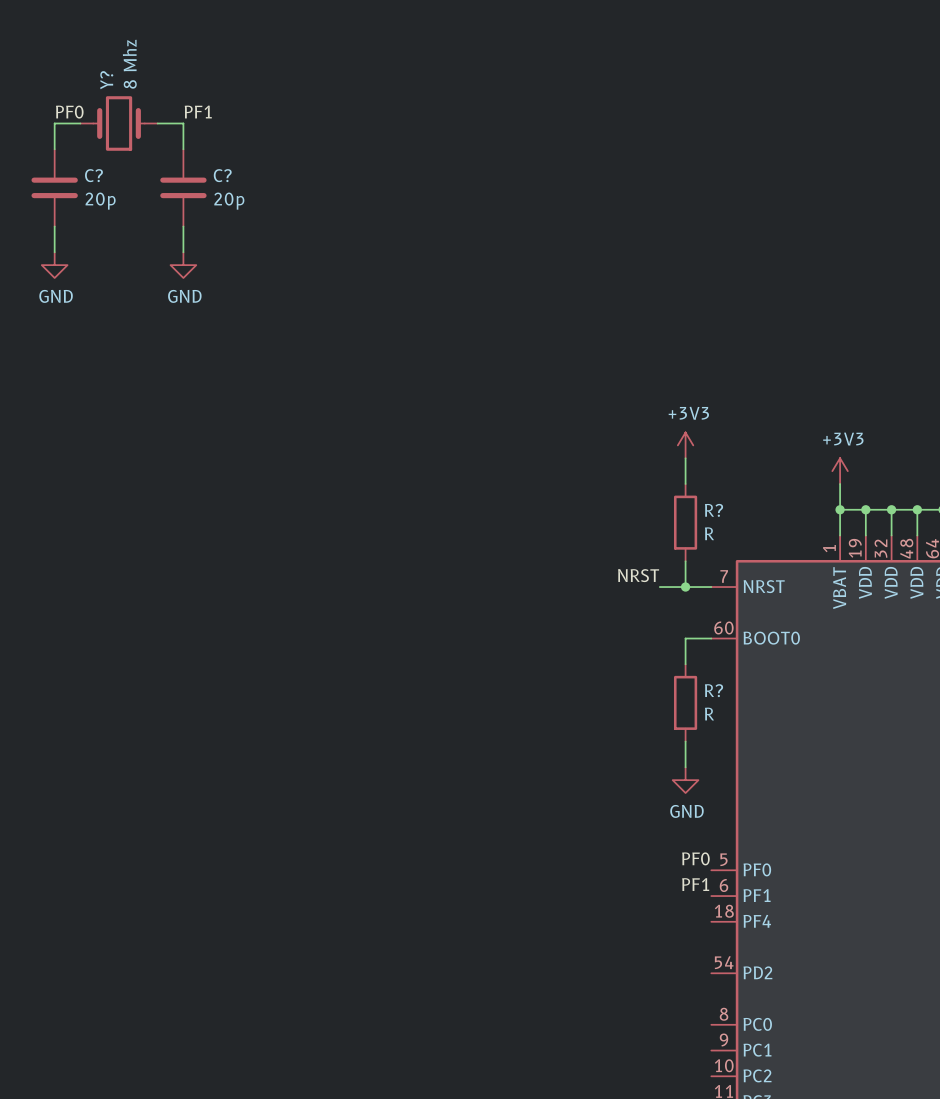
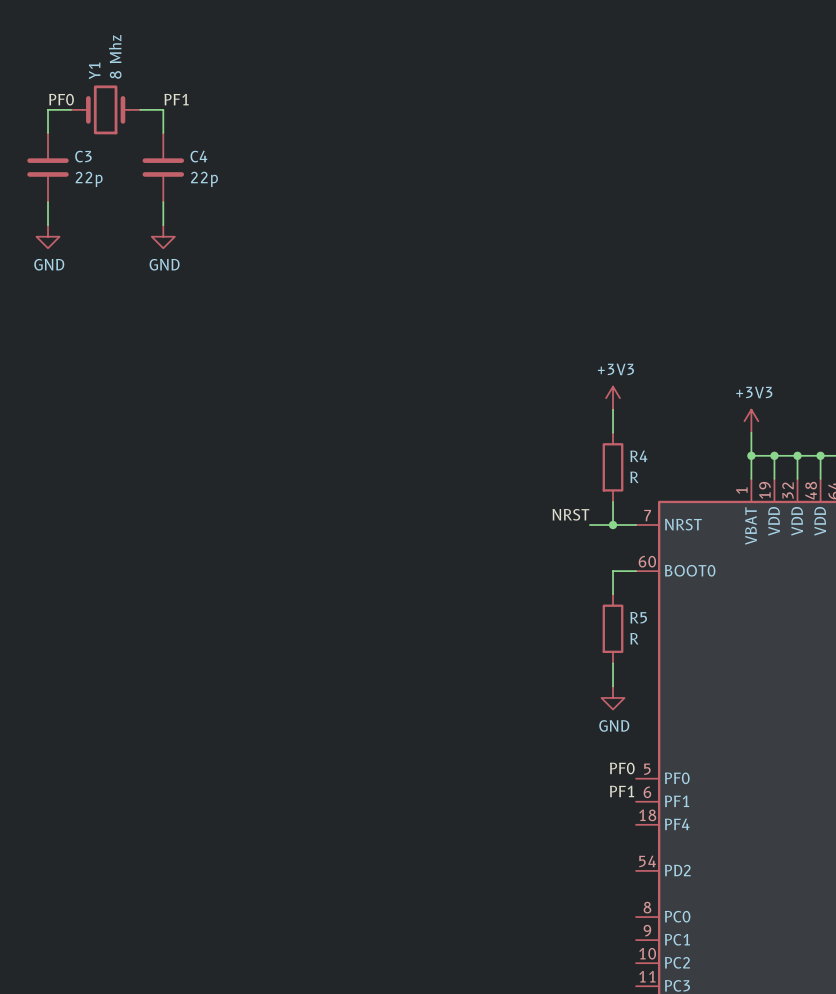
Y? name: Y? (106, 80) -> Y1 (94, 70)
C? name: C? (93, 175) -> C3 (83, 156)
C? name: C? (222, 175) -> C4 (198, 156)
C? value: 20p (100, 201) -> 22p (89, 179)
C? value: 20p (229, 201) -> 22p (204, 179)
R? name: R? (713, 510) -> R4 (638, 456)
R? name: R? (713, 690) -> R5 (638, 617)

